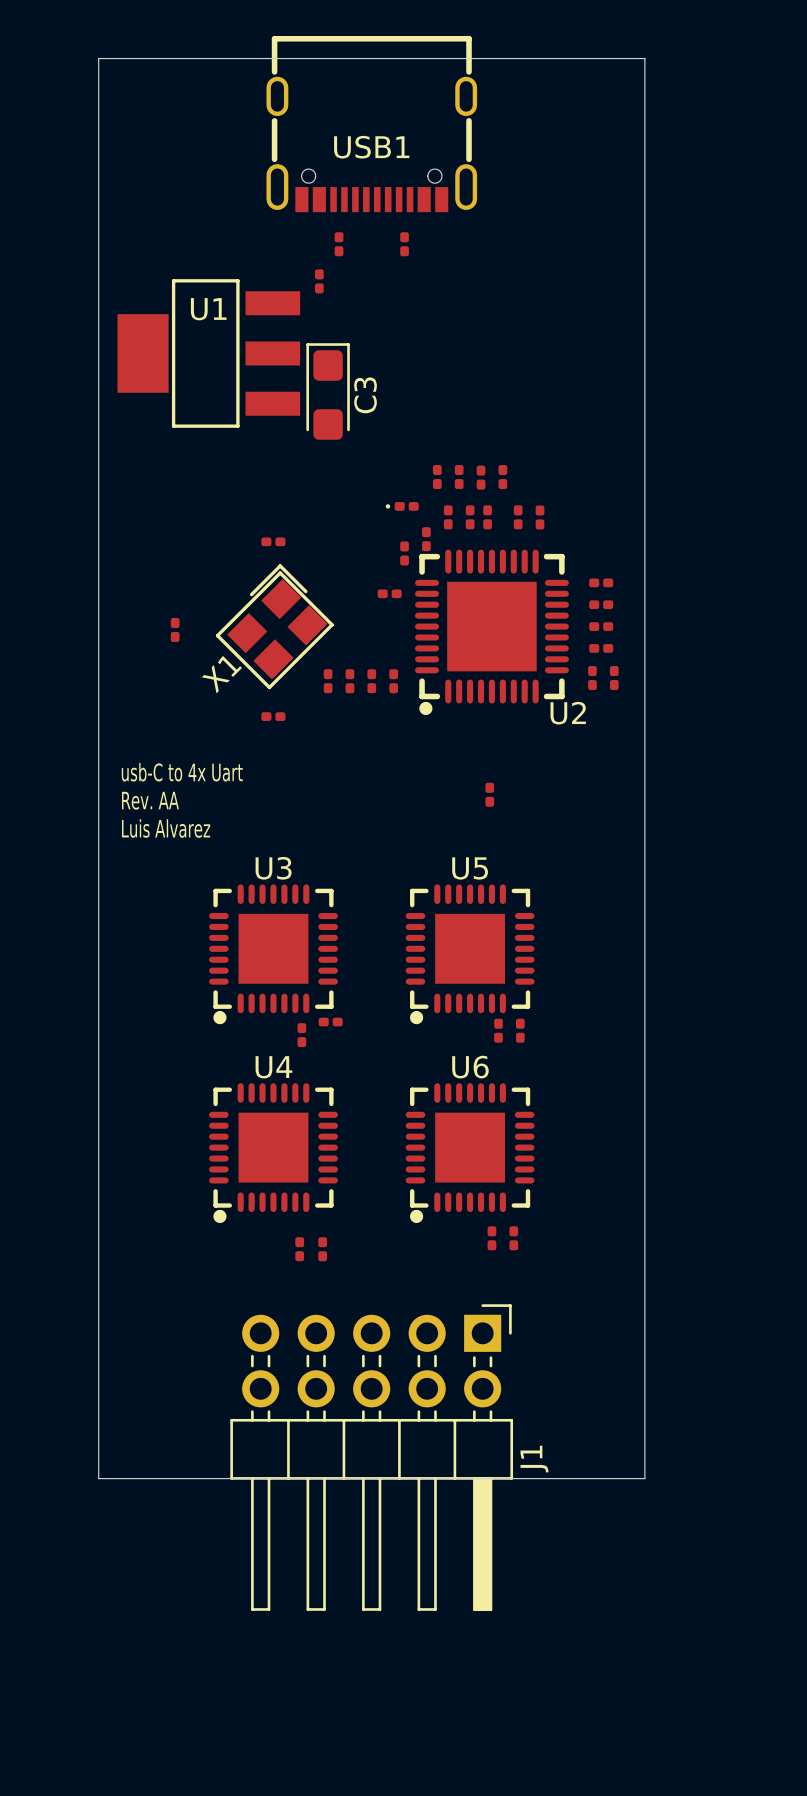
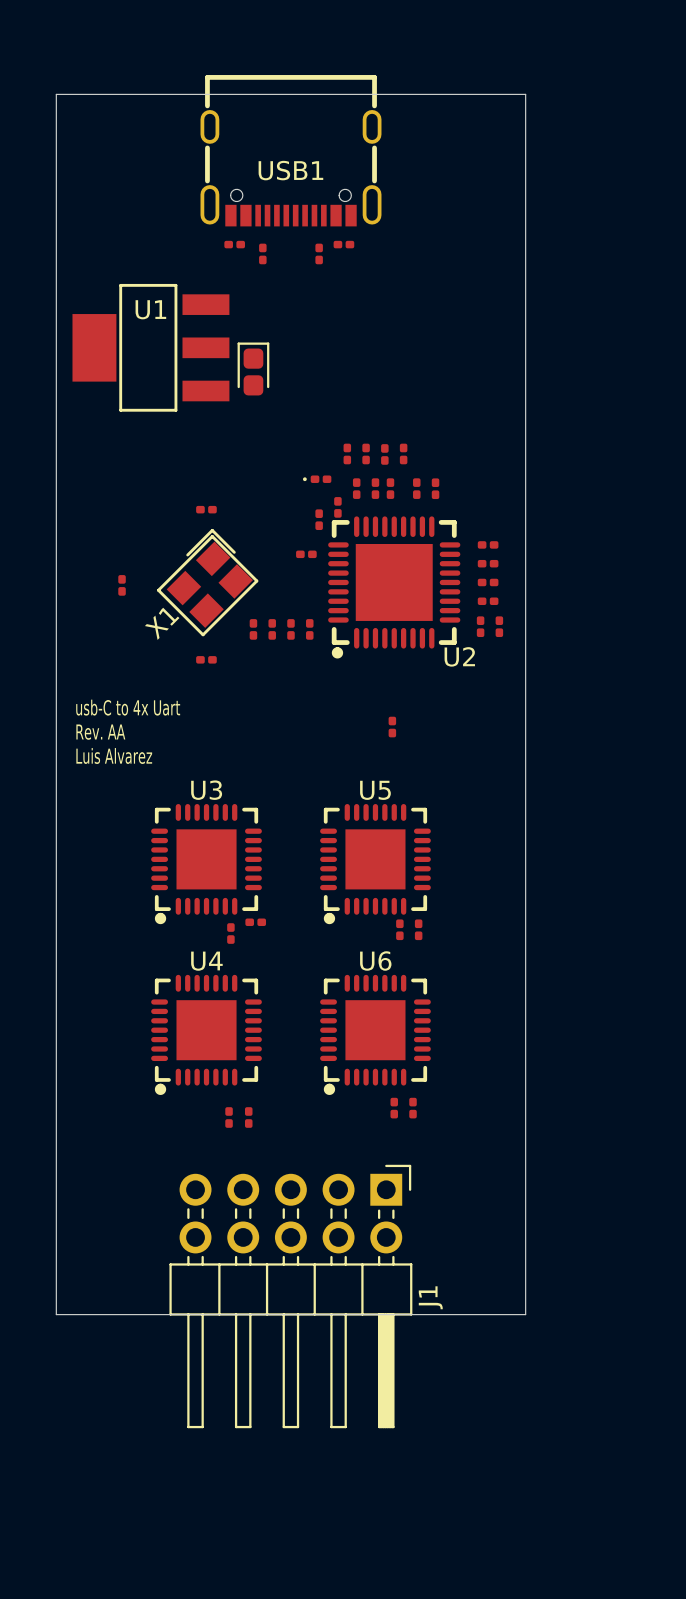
part: none -> (343, 244)
part rotation: 0° (319, 281) -> 90° clockwise (234, 244)
part position: (319, 281) -> (234, 244)
part: none -> (253, 368)
C3: (328, 391) -> none

